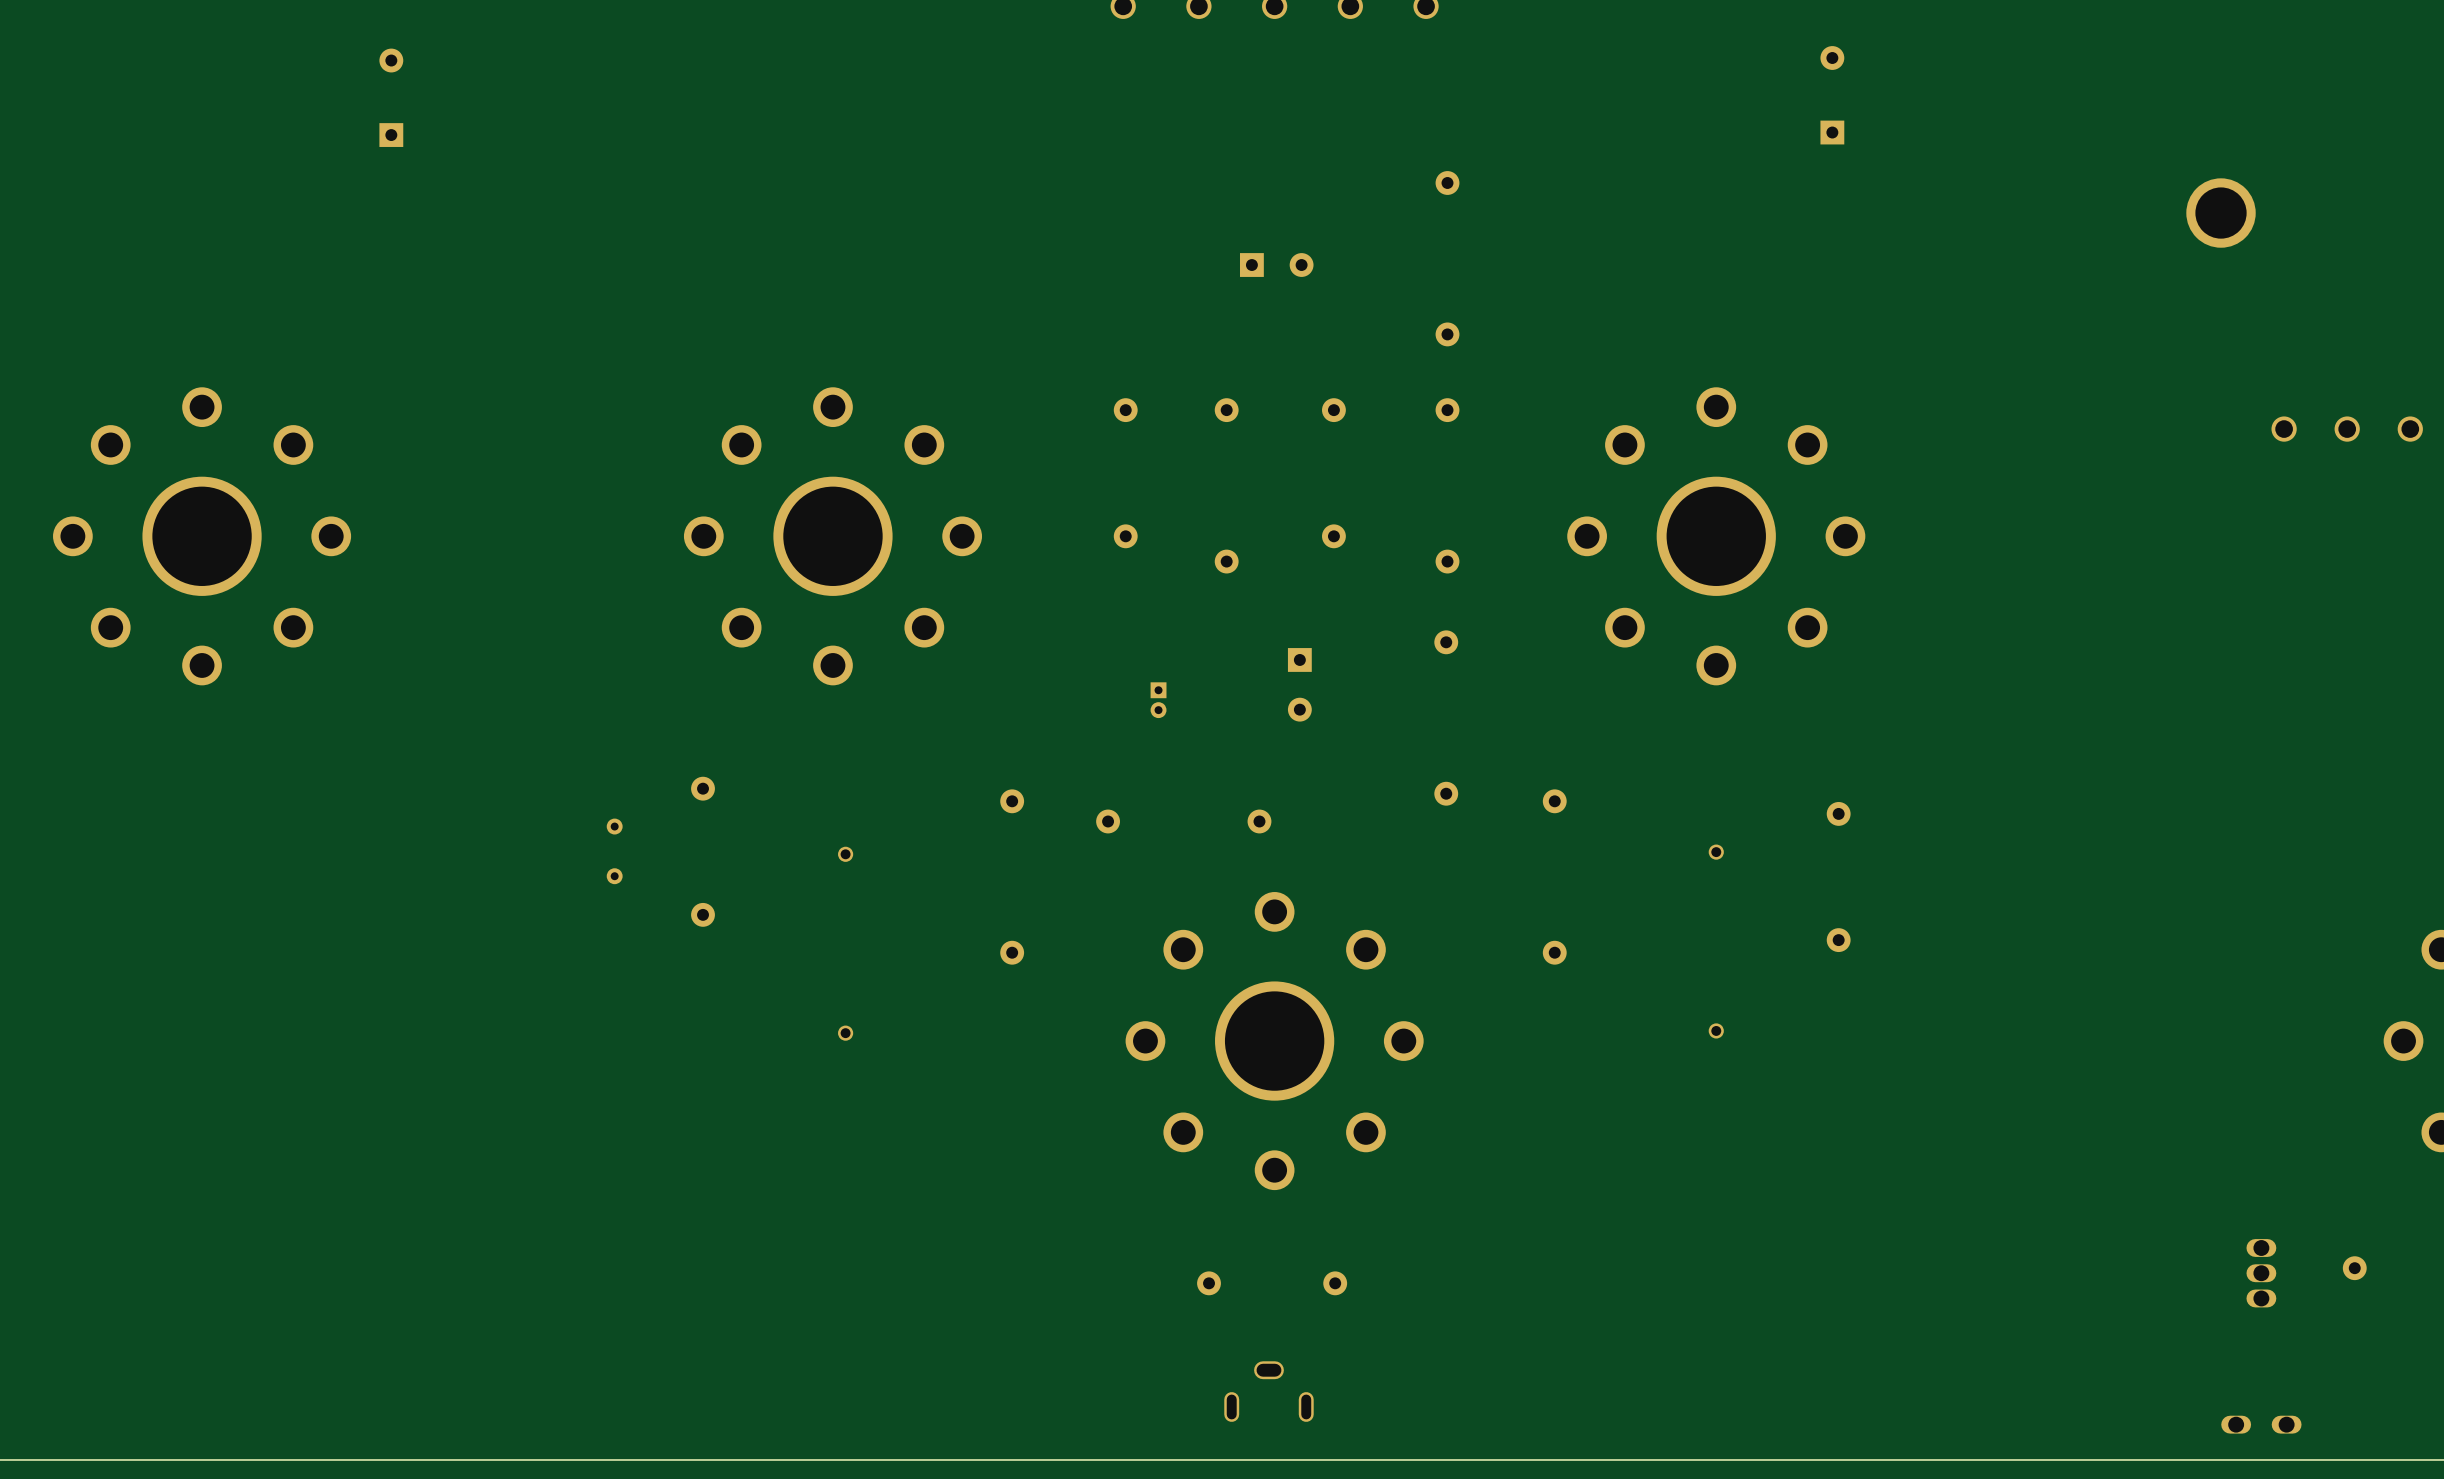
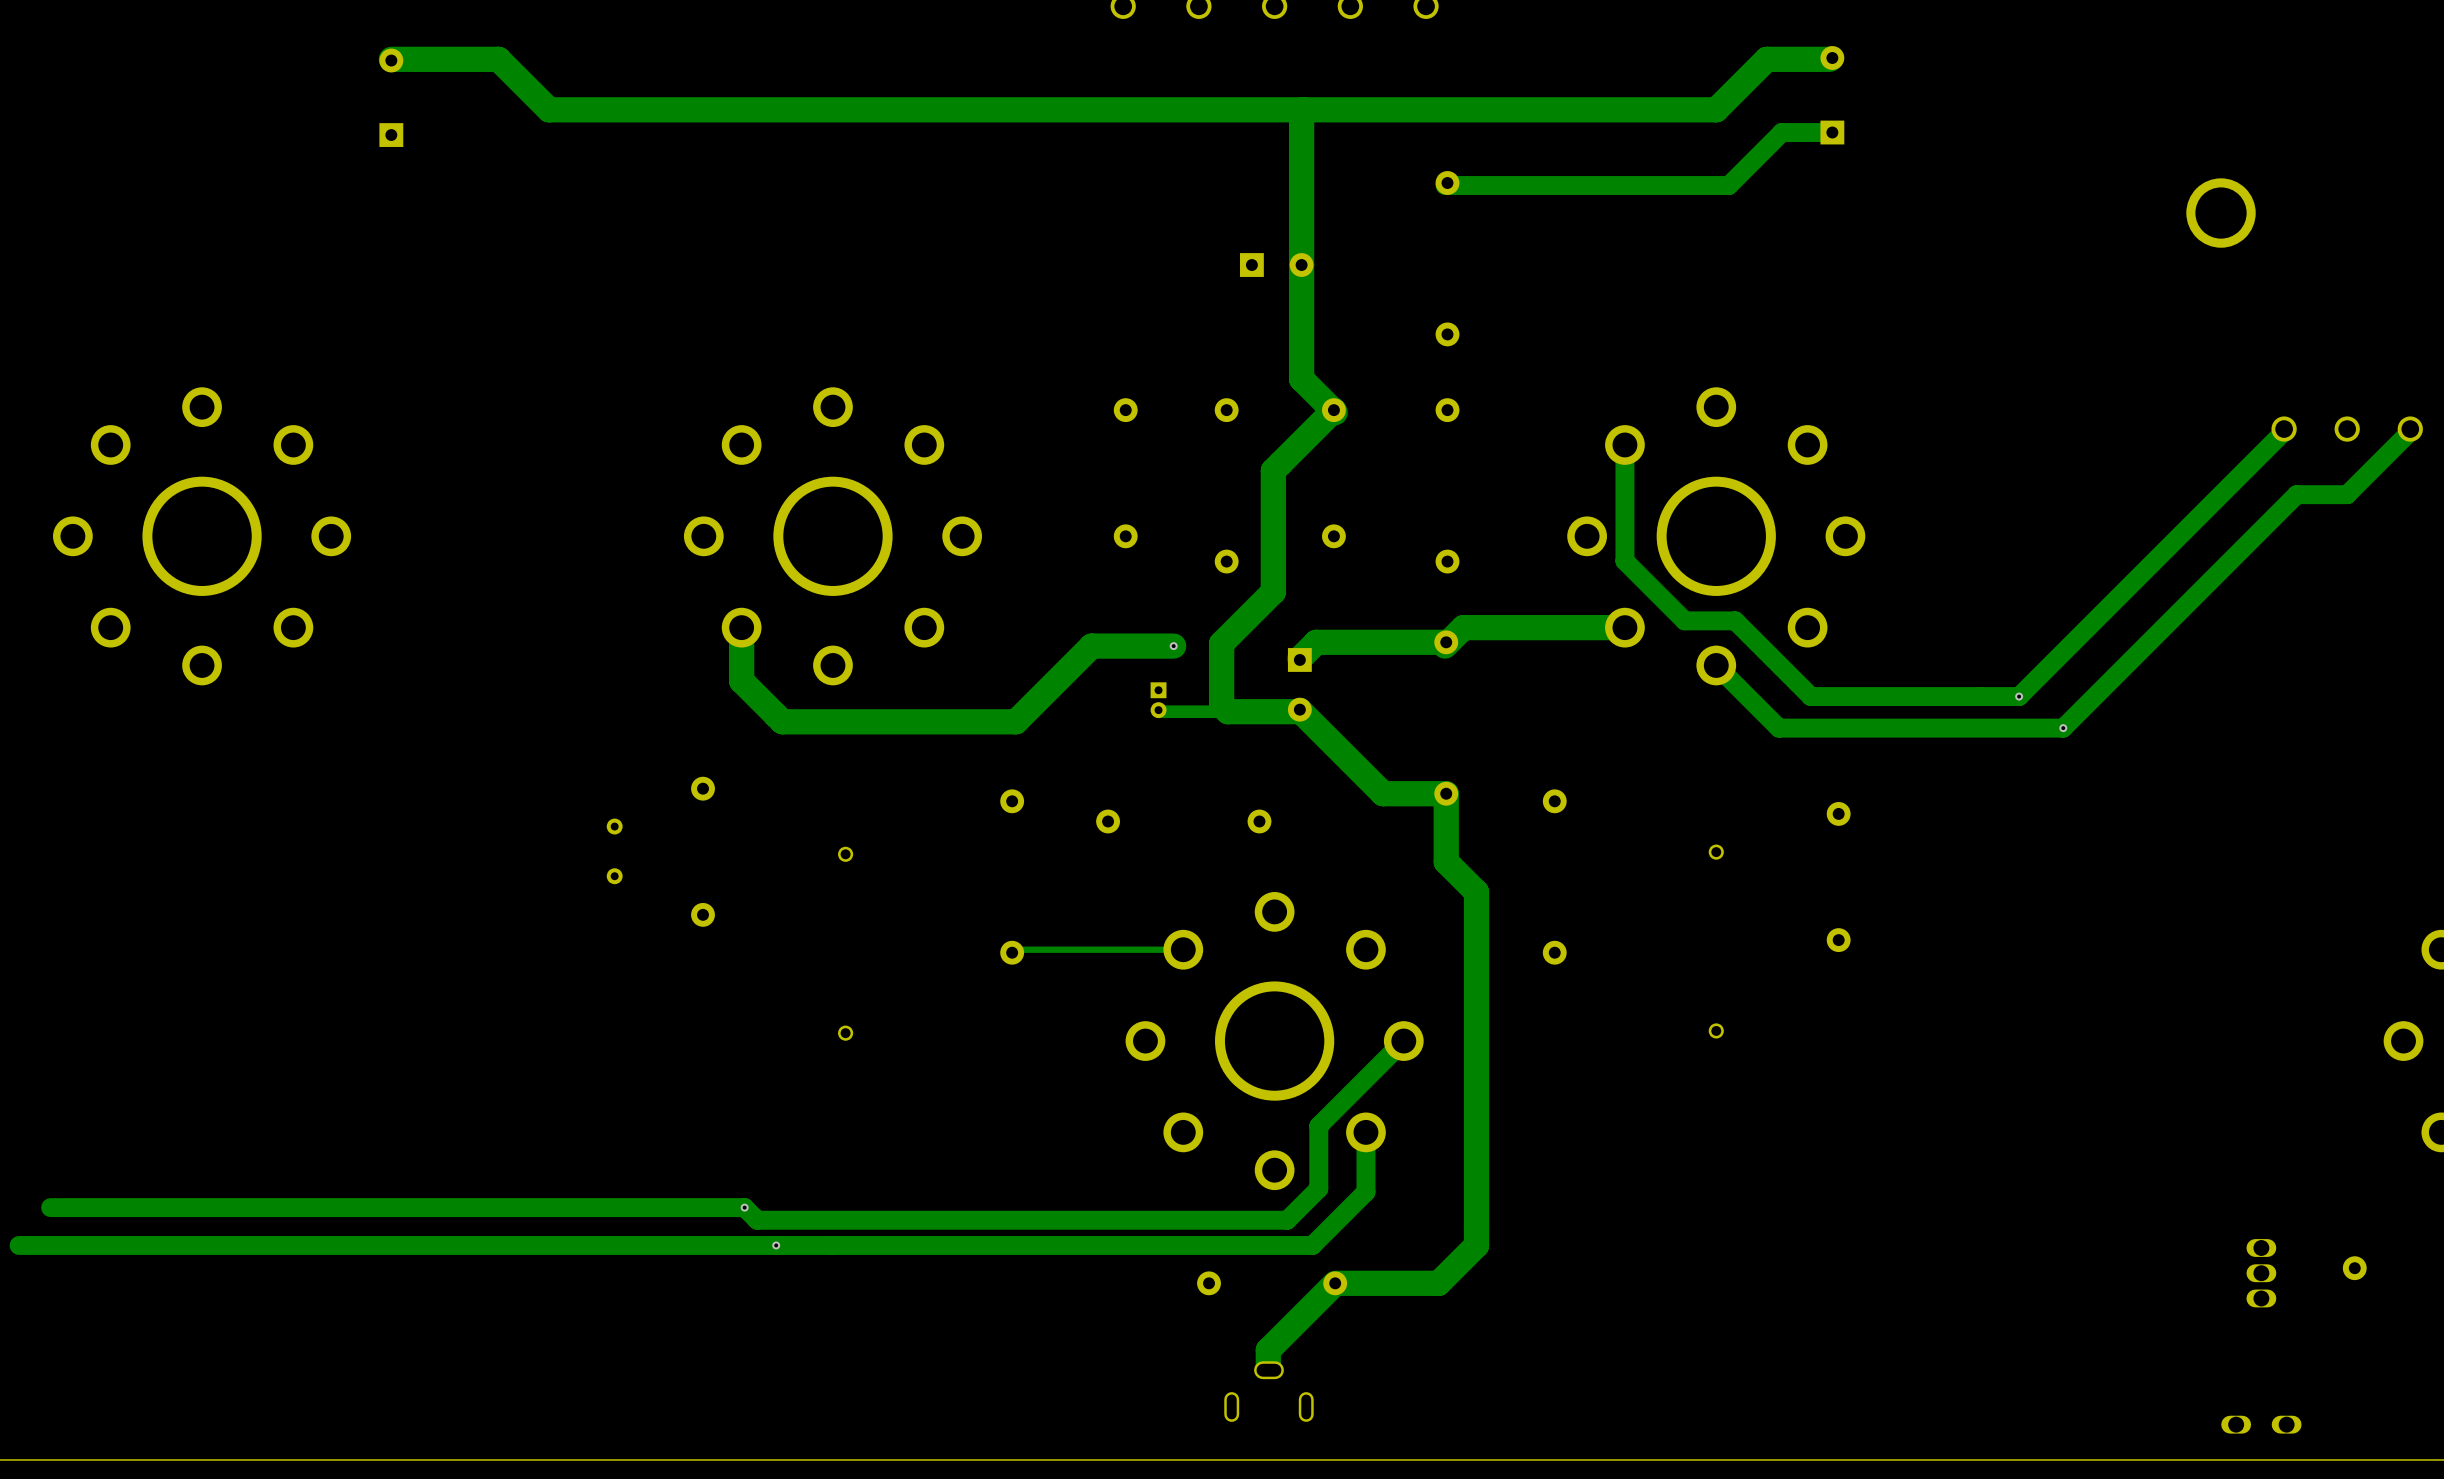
track: none -> (1829, 59) (1766, 59) (1716, 109) (549, 109) (498, 59) (391, 59)
track: none -> (1303, 109) (1301, 111) (1301, 379) (1335, 412)
track: none -> (1832, 132) (1781, 132) (1728, 185) (1444, 185)
track: none -> (1333, 410) (1273, 470) (1273, 591) (1221, 643) (1221, 705) (1227, 711)
track: none -> (2284, 431) (2019, 696) (1810, 696) (1735, 620) (1684, 620) (1624, 561) (1624, 444)
track: none -> (2410, 431) (2347, 494) (2296, 494) (2063, 728) (1778, 728) (1716, 665)
track: none -> (741, 627) (741, 680) (782, 721) (1015, 721) (1091, 646) (1173, 646)
track: none -> (1624, 627) (1463, 627) (1444, 646)
track: none -> (1446, 642) (1316, 642) (1299, 658)
via: none -> (1173, 646)
via: none -> (2019, 696)
track: none -> (1299, 710) (1383, 793) (1446, 793) (1446, 861) (1476, 892) (1476, 1245) (1438, 1283) (1337, 1283)
track: none -> (1227, 711) (1158, 711)
track: none -> (1298, 711) (1227, 711)
via: none -> (2063, 728)
track: none -> (1183, 949) (1015, 949) (1009, 955)
track: none -> (1403, 1041) (1318, 1126) (1318, 1188) (1287, 1220) (757, 1220) (744, 1207) (50, 1207)
track: none -> (1365, 1132) (1365, 1191) (1312, 1245) (19, 1245)
via: none -> (744, 1207)
via: none -> (776, 1245)
track: none -> (1335, 1283) (1268, 1350) (1268, 1365)

